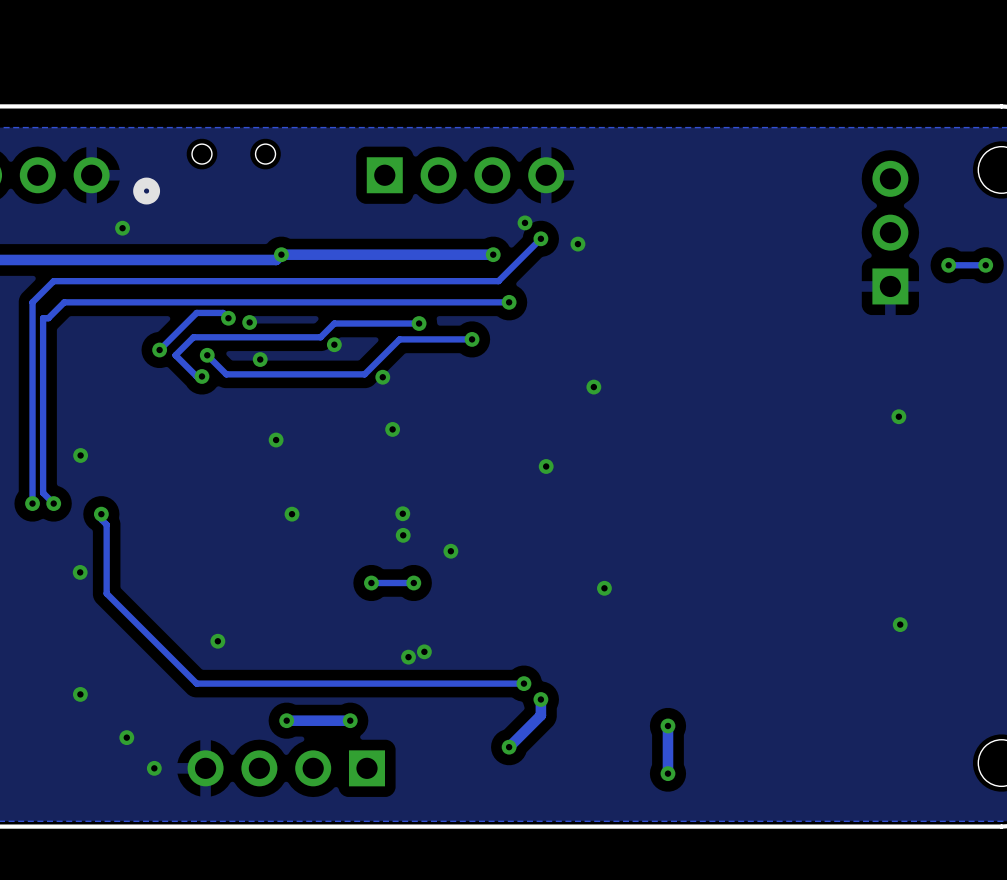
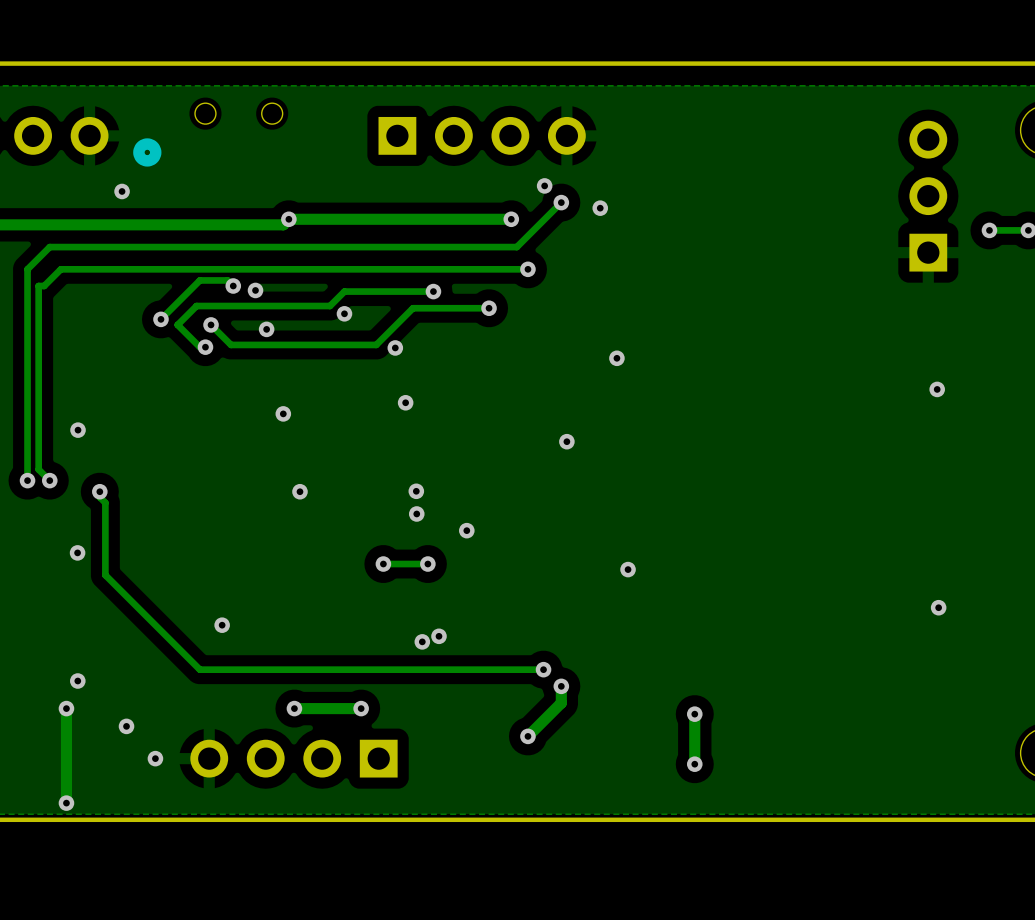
track: none -> (66, 708) (66, 803)
via: none -> (66, 708)
via: none -> (66, 803)

